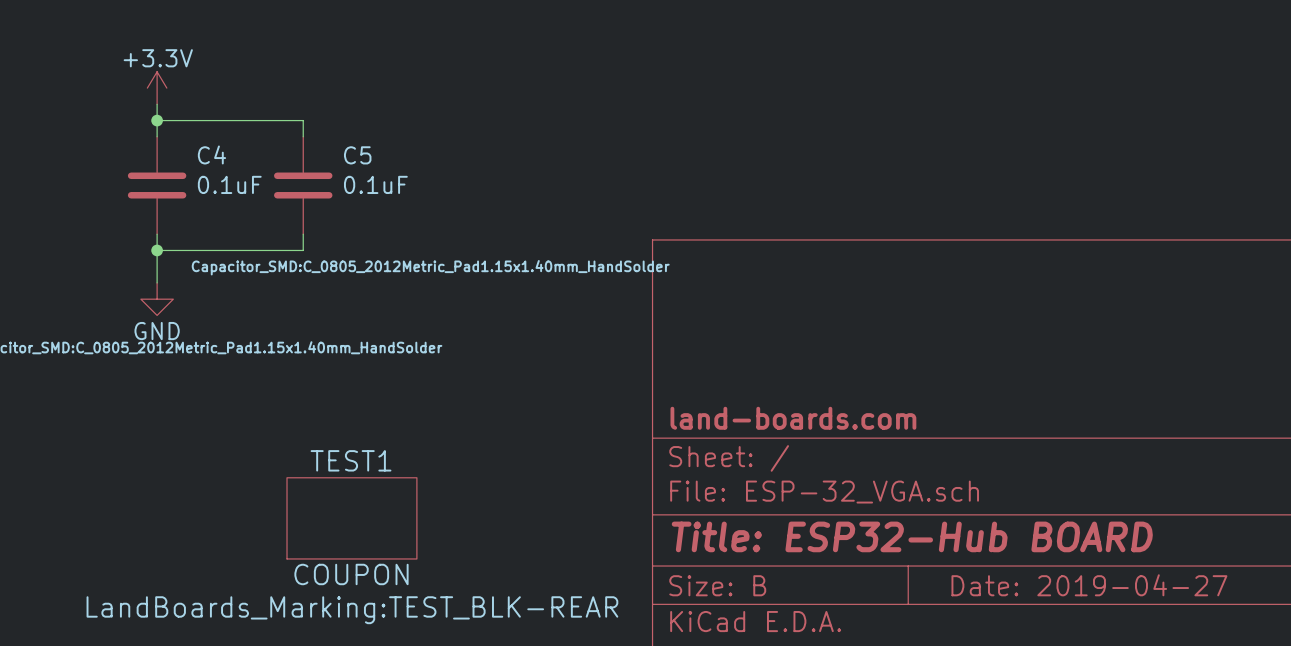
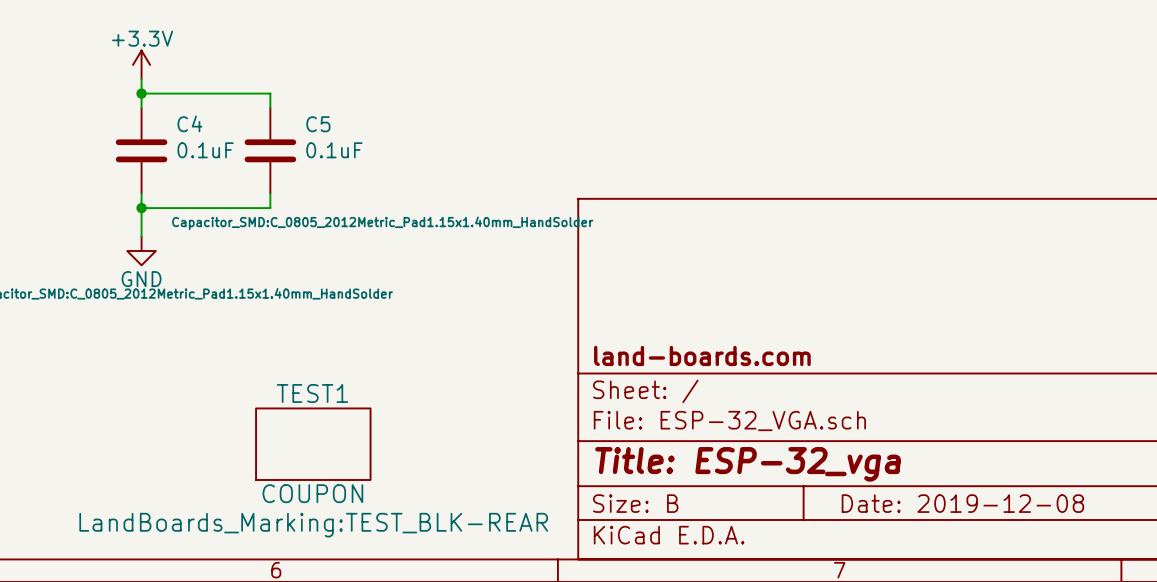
title block: Title: ESP32-Hub BOARD (912, 536) -> Title: ESP-32_vga (748, 464)
title block: Date: 2019-04-27 (1089, 585) -> Date: 2019-12-08 (962, 503)

